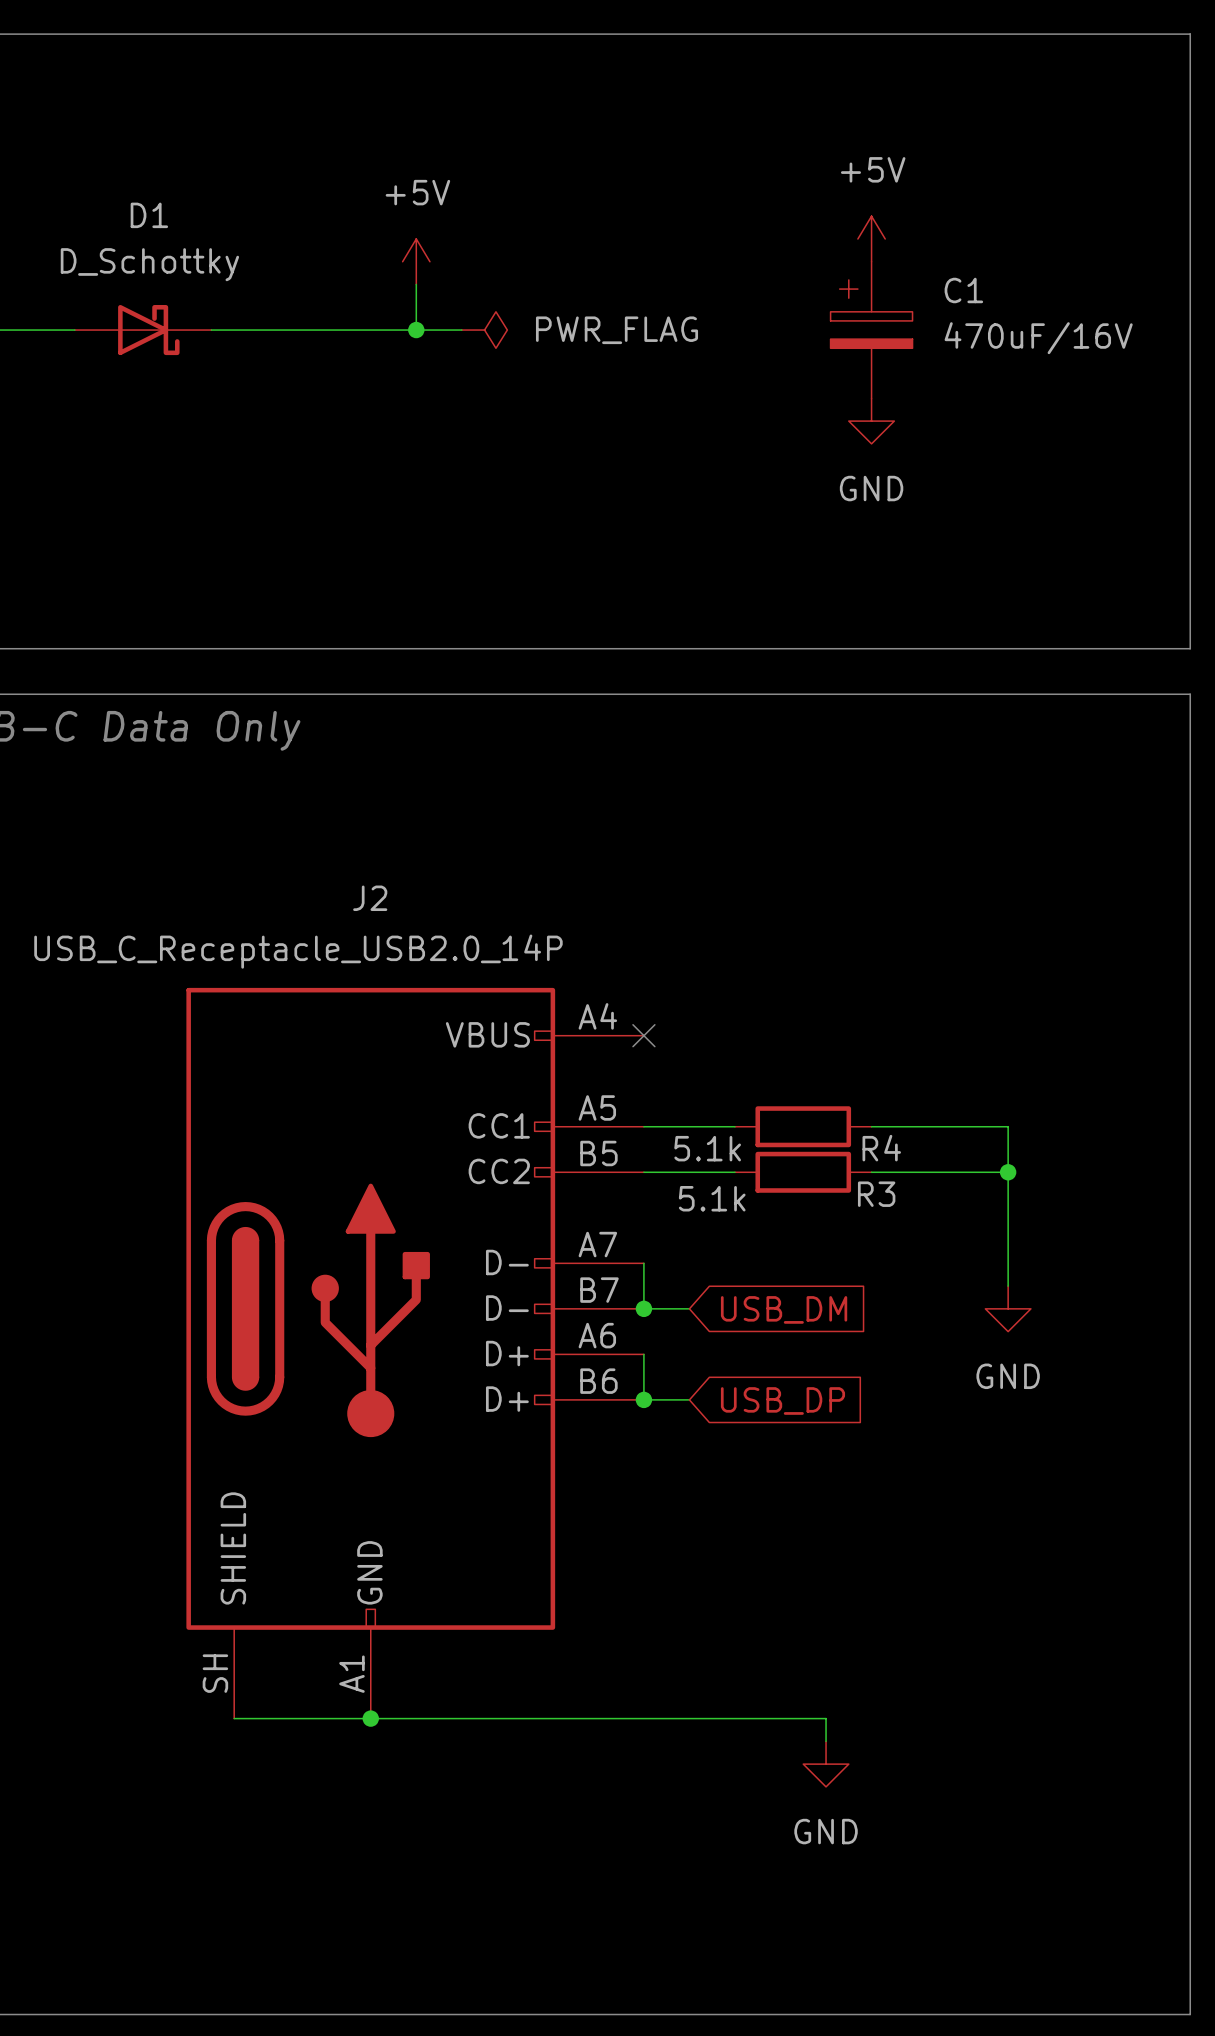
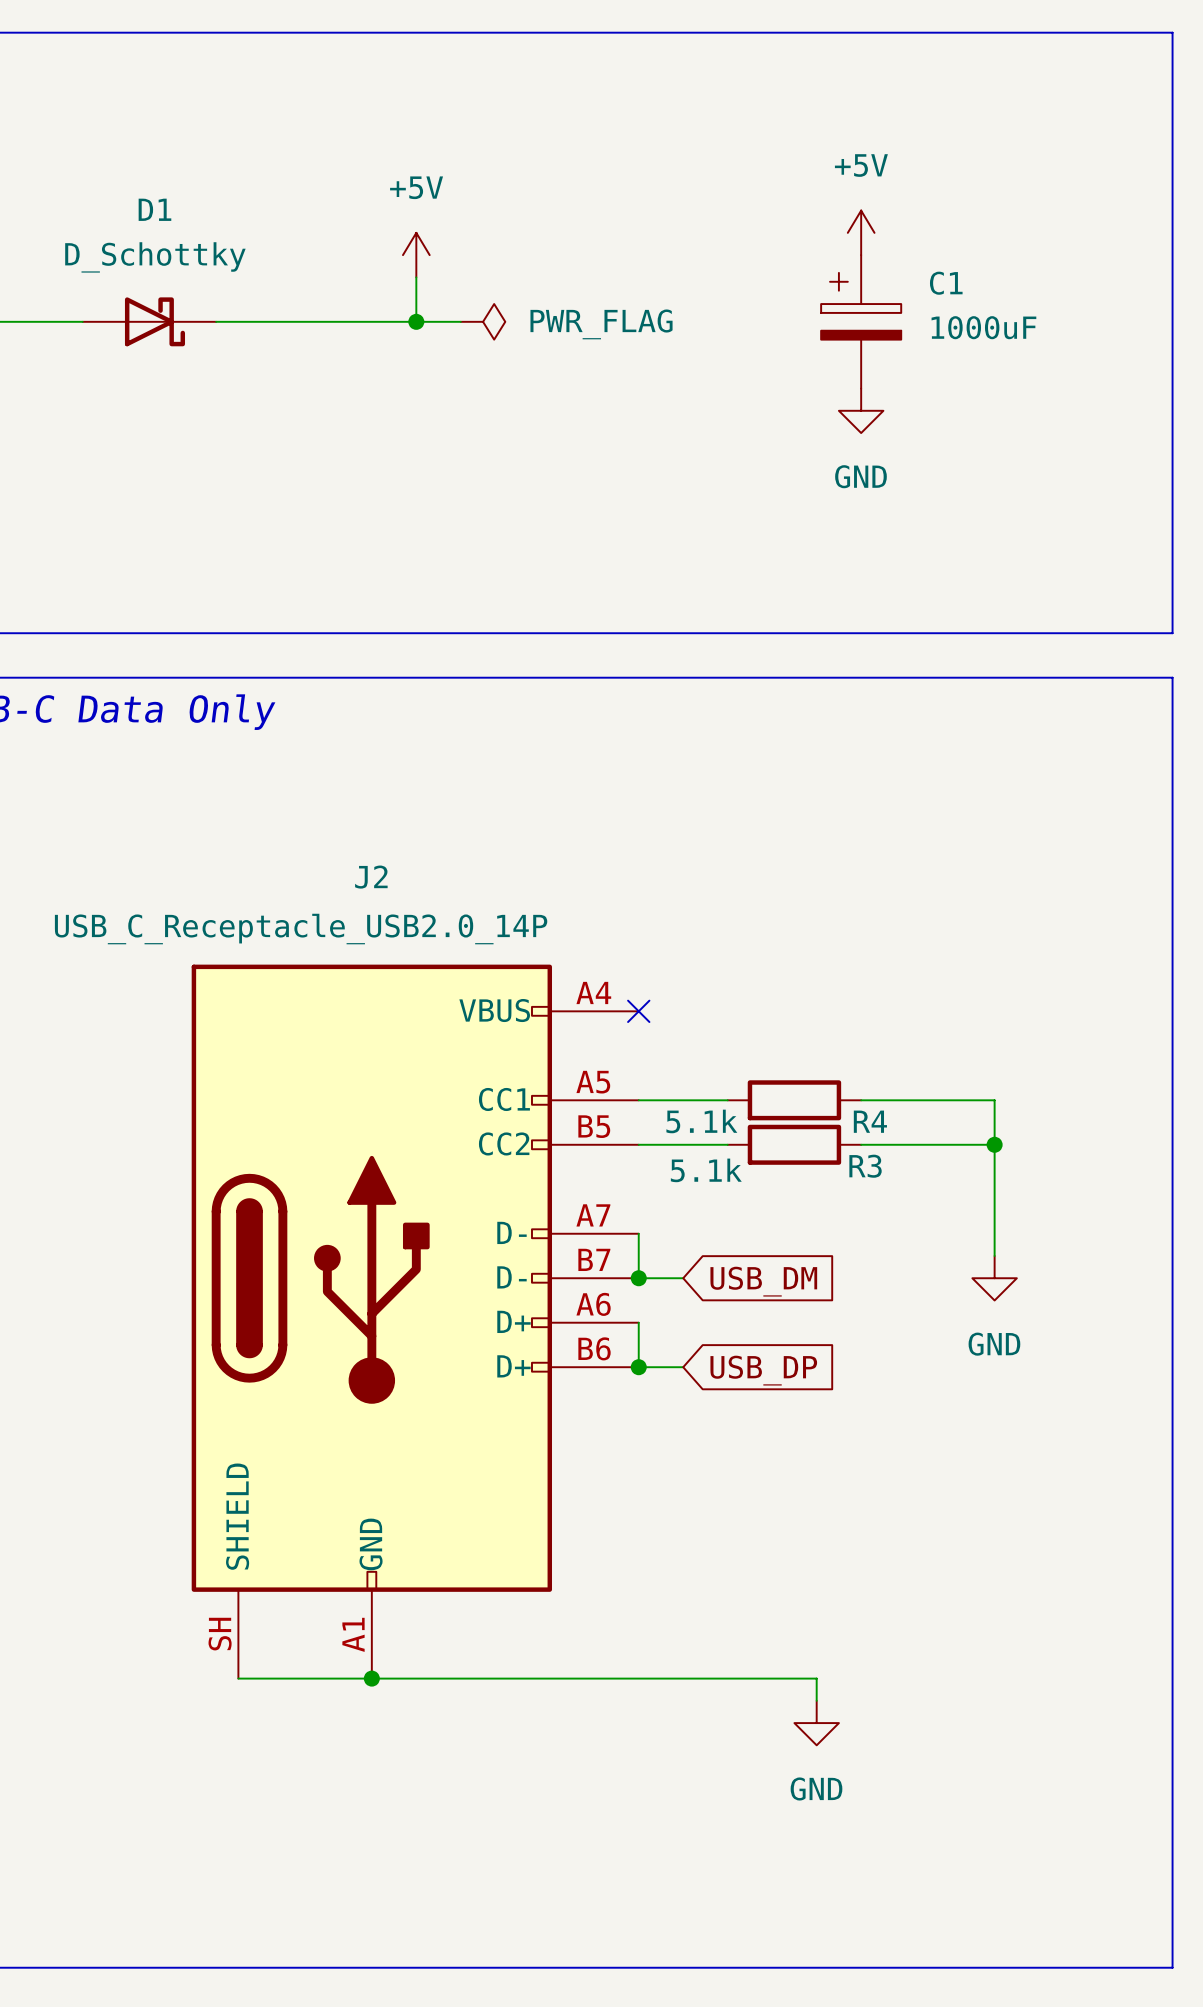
C1 value: 470uF/16V (1038, 338) -> 1000uF (983, 327)

